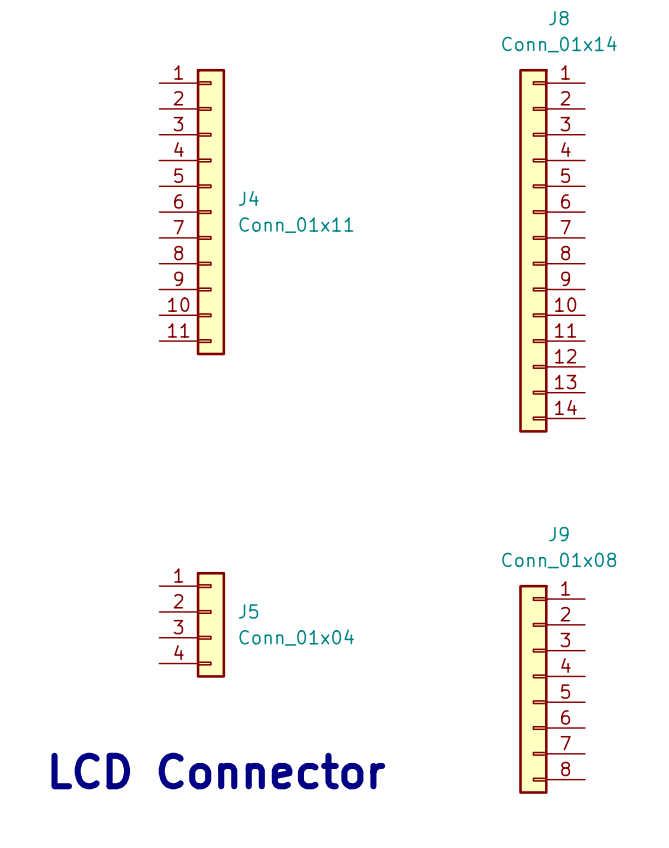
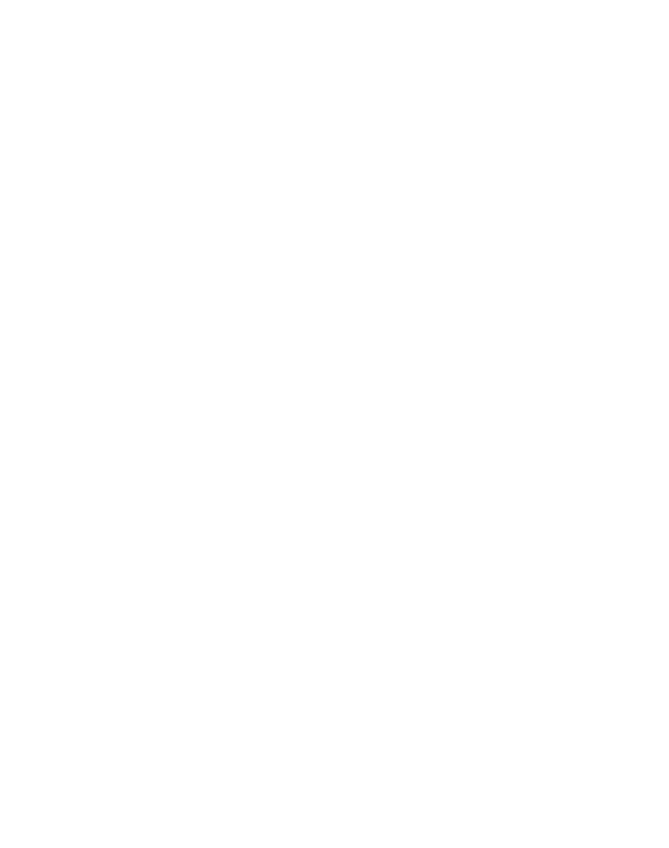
J4: Conn_01x11 (192, 212) -> none
J8: Conn_01x14 (552, 250) -> none
J5: Conn_01x04 (192, 624) -> none
J9: Conn_01x08 (552, 689) -> none
text: LCD Connector (218, 771) -> none

